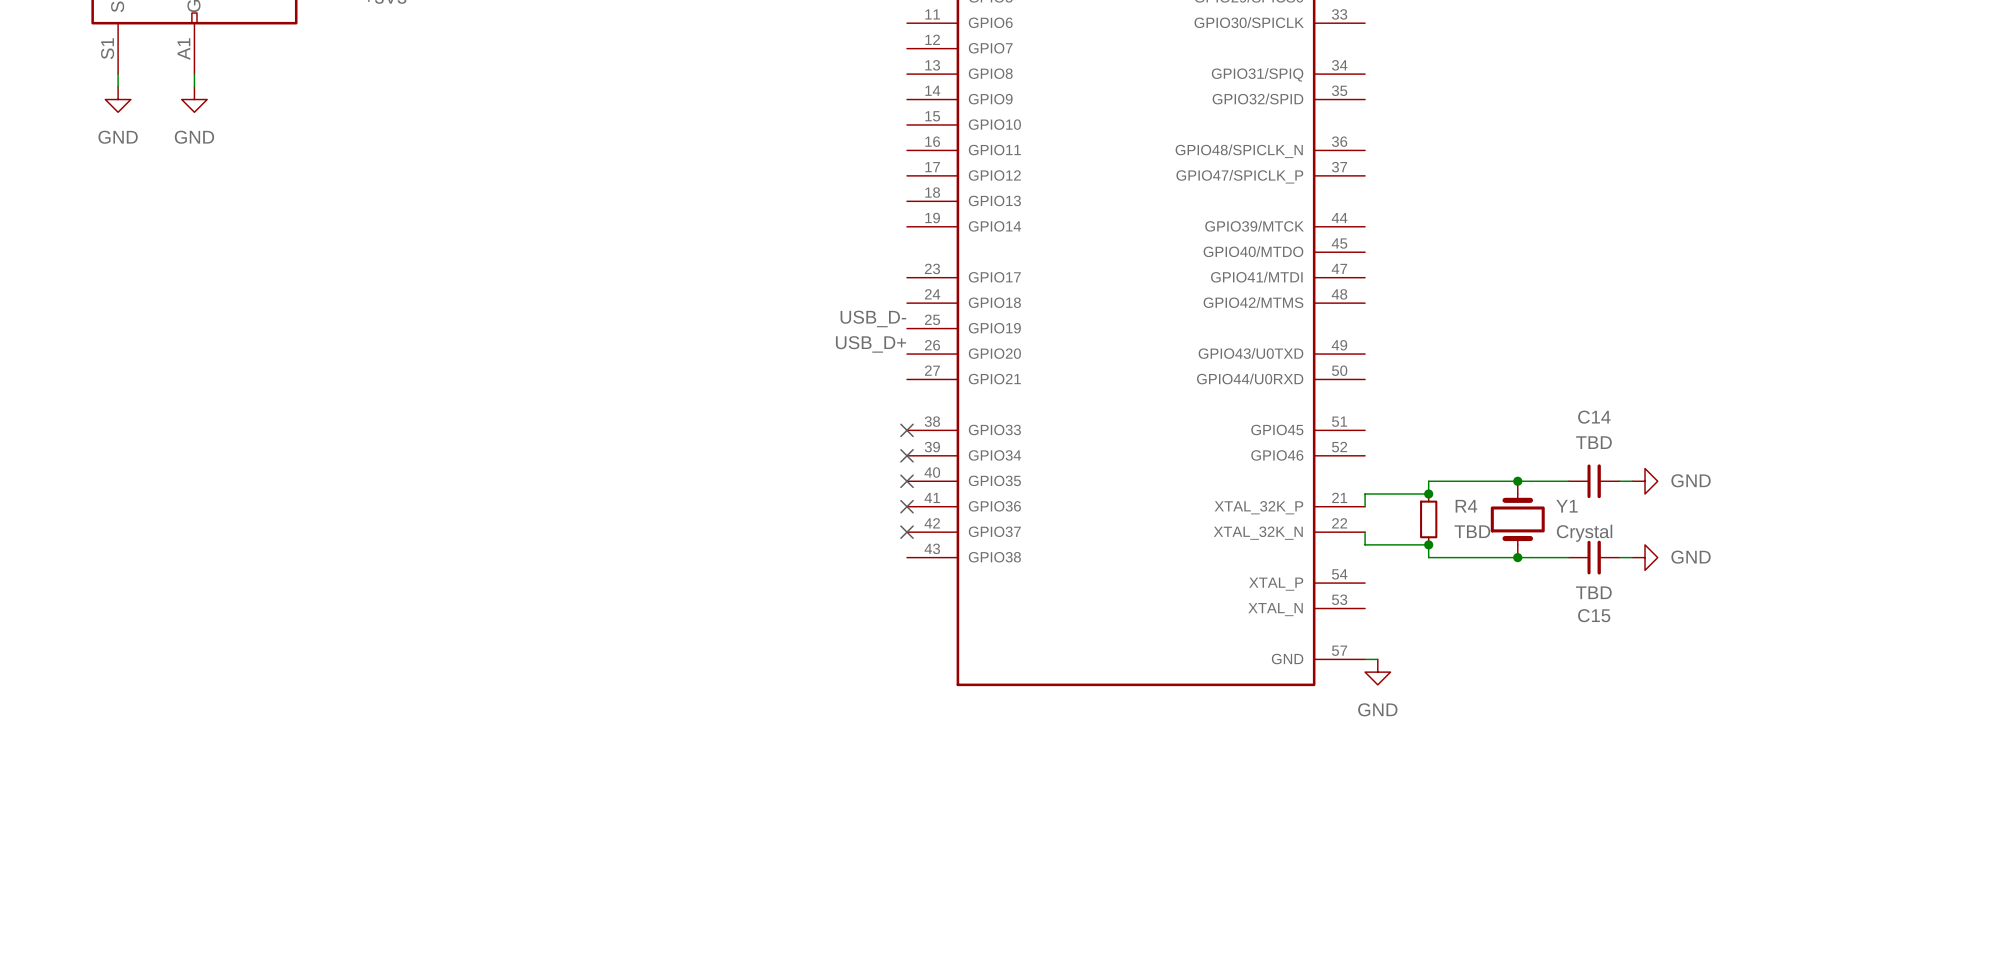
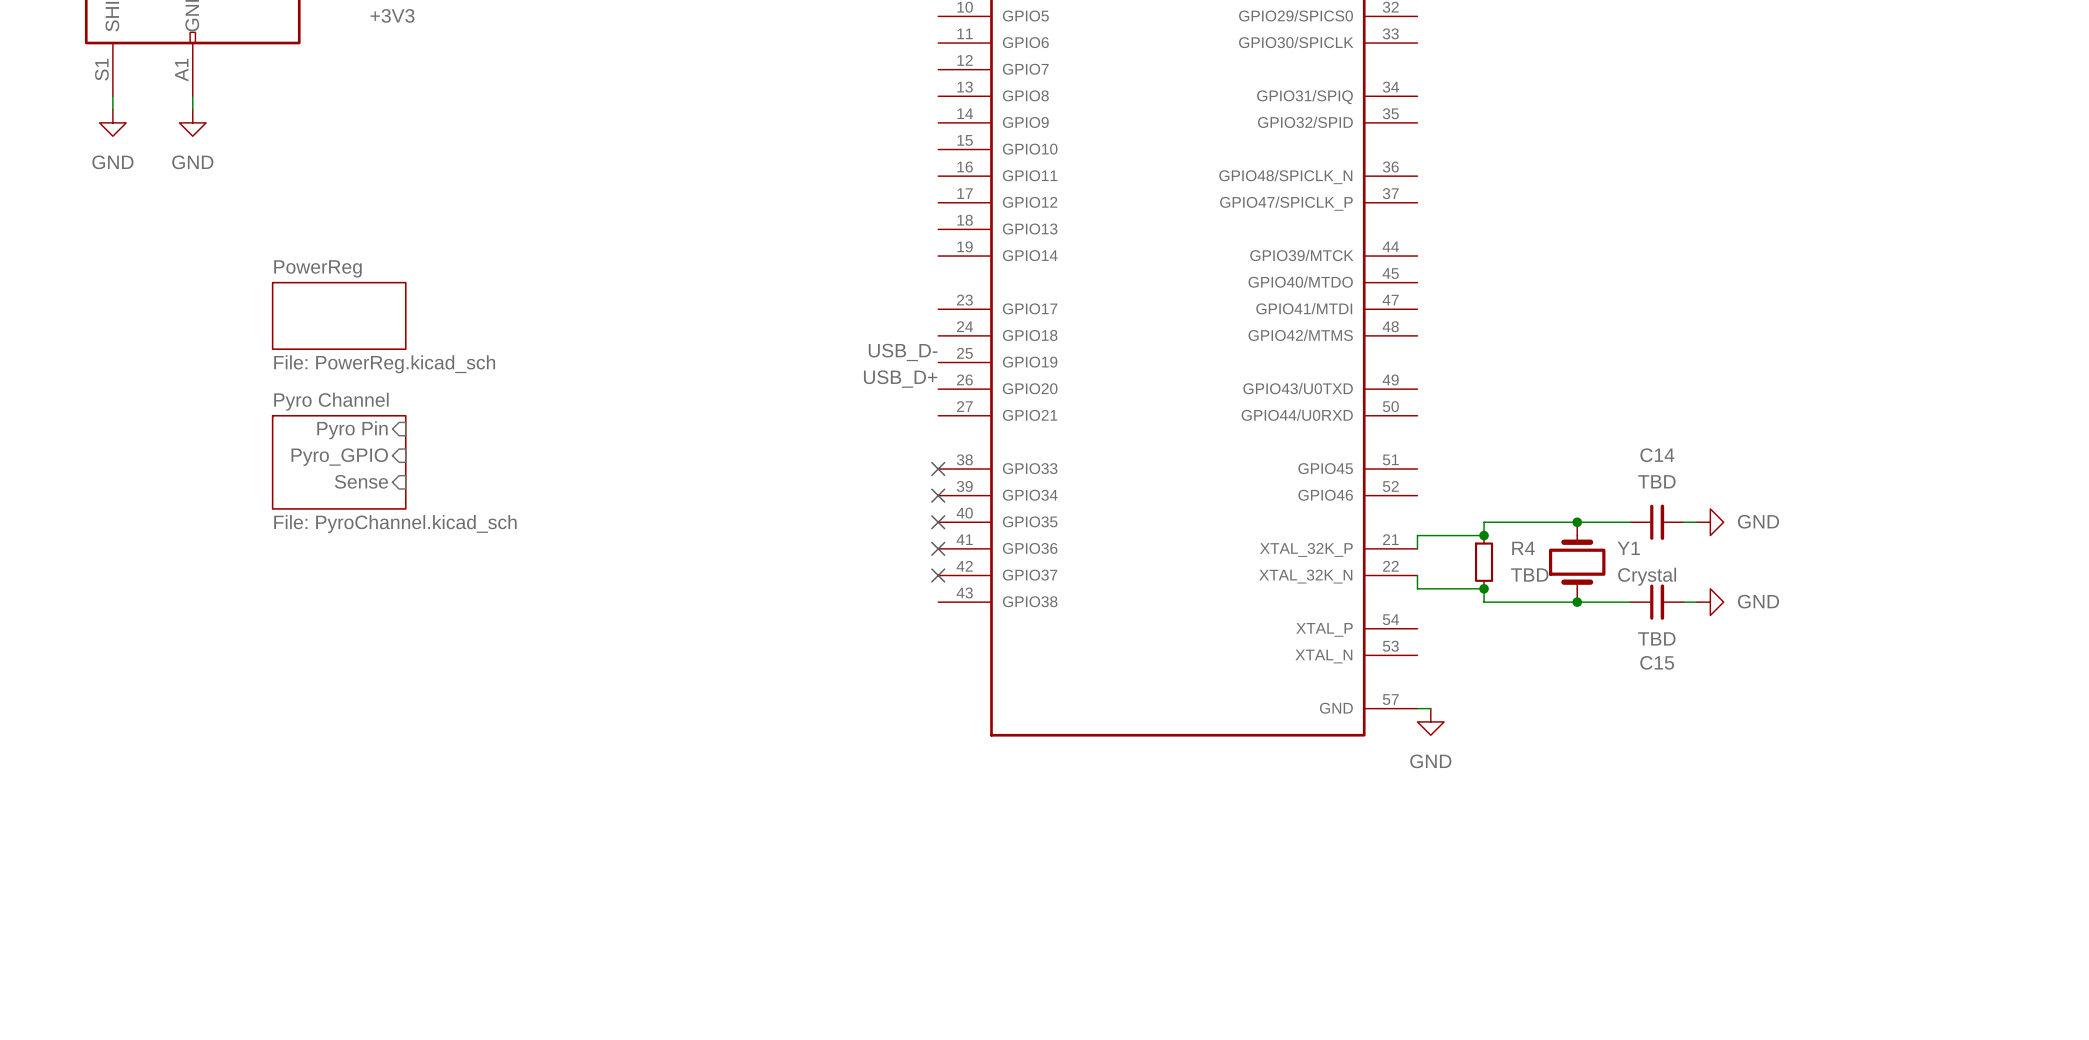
sheet PowerReg: none -> File: PowerReg.kicad_sch (339, 315)
sheet pin: none -> Pyro Pin (352, 430)
sheet pin: none -> Pyro_GPIO (339, 457)
sheet Pyro Channel: none -> File: PyroChannel.kicad_sch (339, 462)
sheet pin: none -> Sense (361, 481)

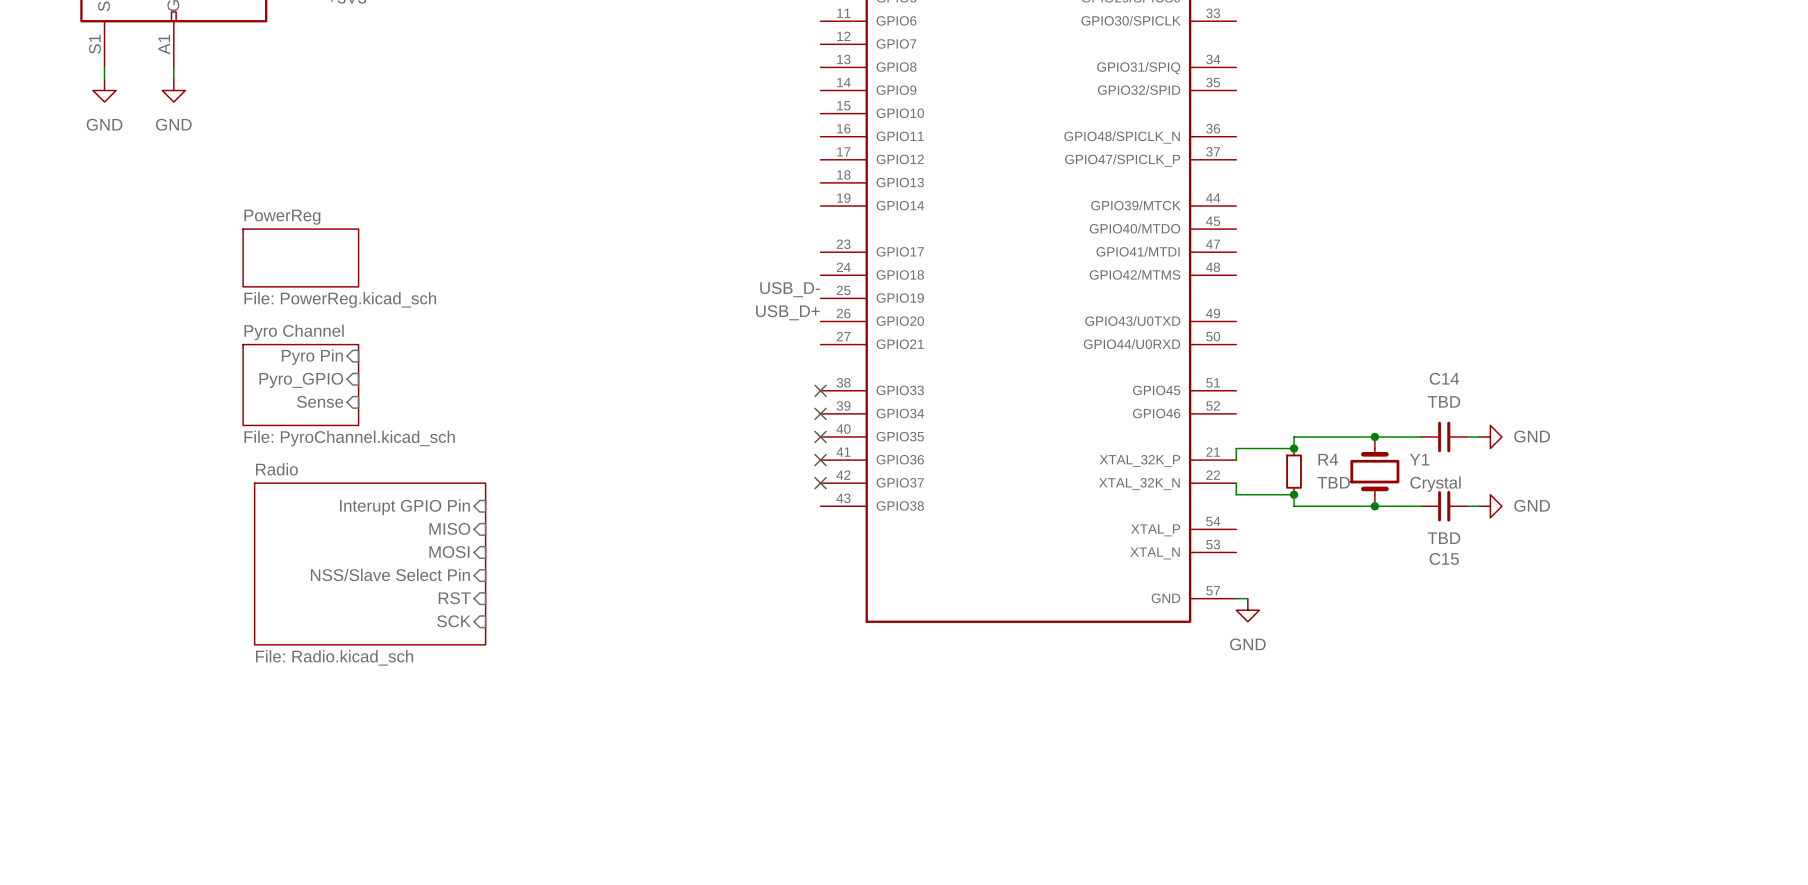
sheet pin: none -> Interupt GPIO Pin (404, 507)
sheet pin: none -> MISO (449, 528)
sheet pin: none -> MOSI (449, 552)
sheet Radio: none -> File: Radio.kicad_sch (370, 564)
sheet pin: none -> NSS/Slave Select Pin (390, 574)
sheet pin: none -> RST (454, 598)
sheet pin: none -> SCK (453, 621)

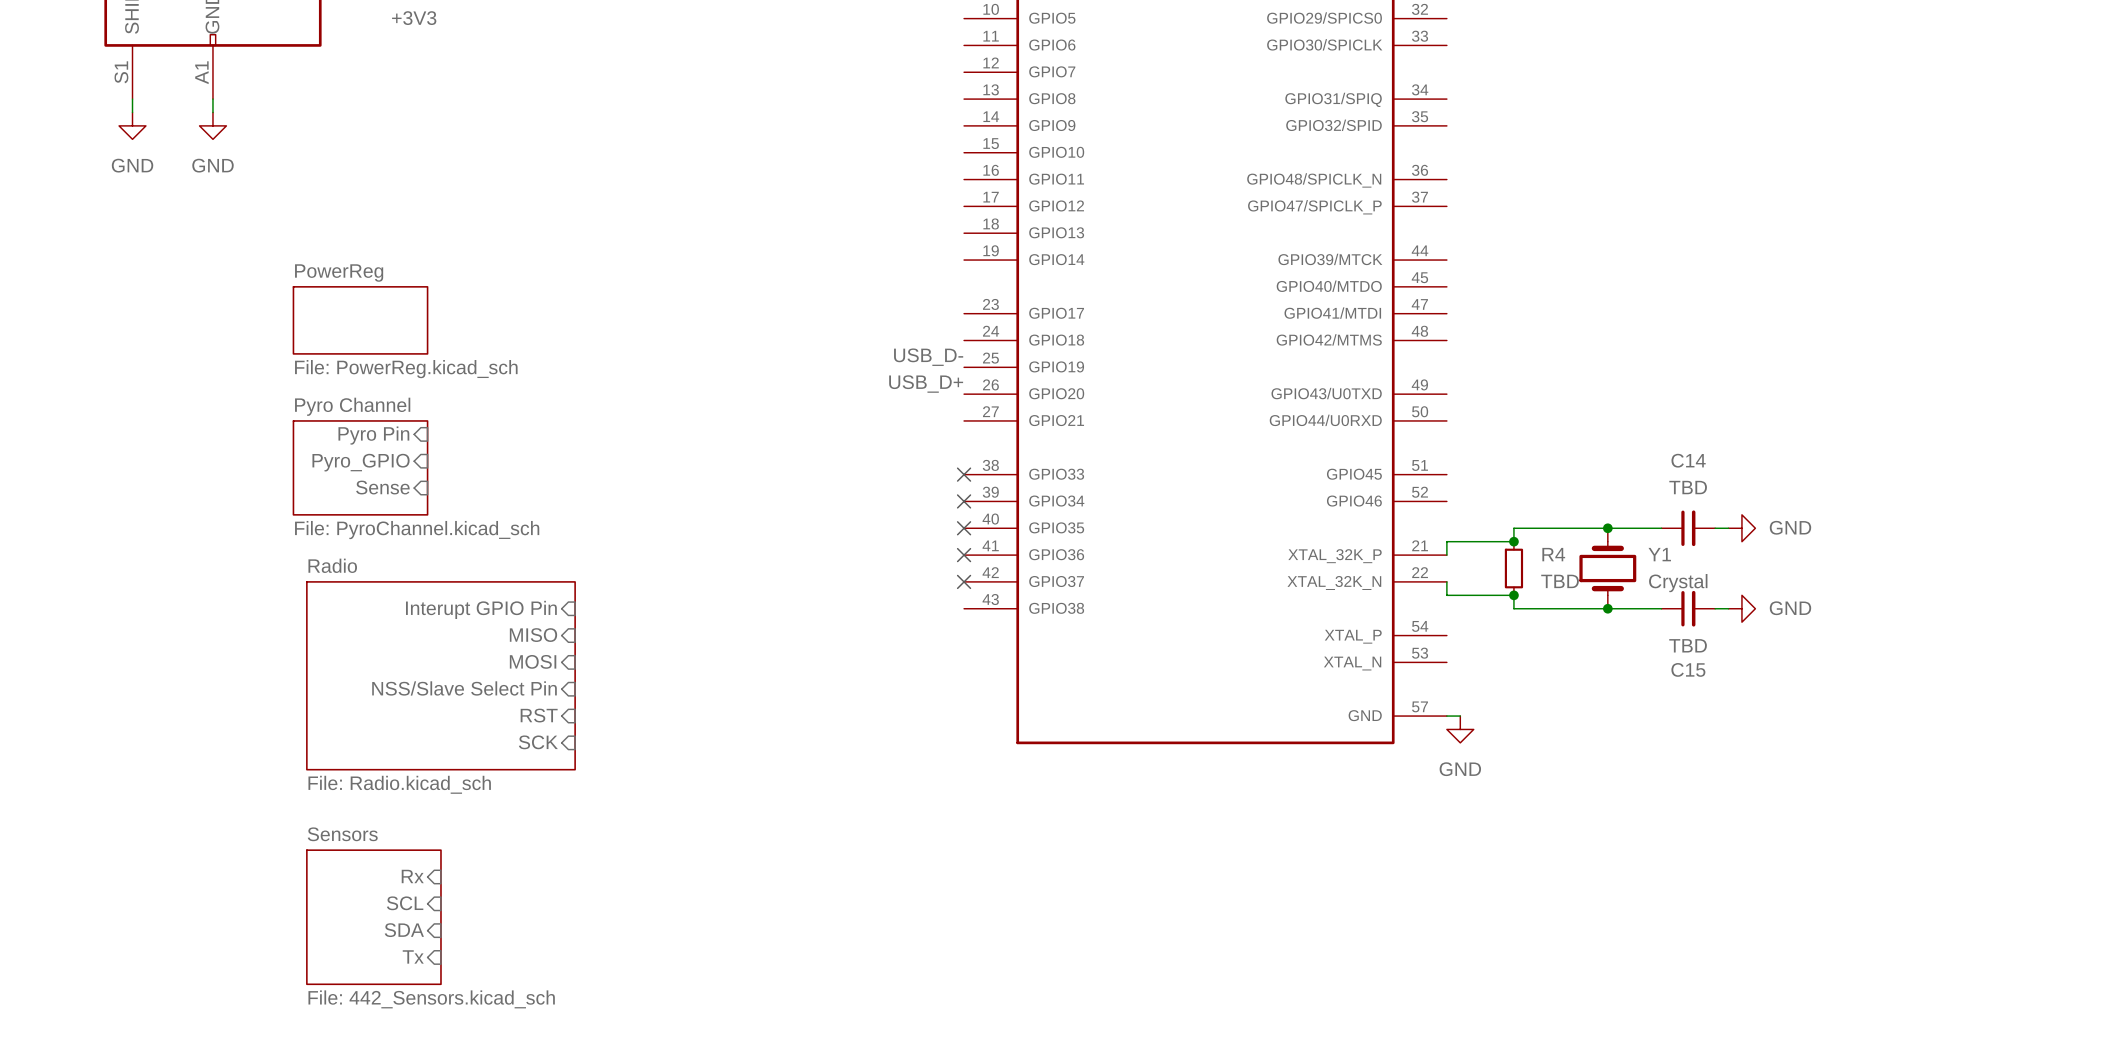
sheet pin: none -> Rx (412, 876)
sheet pin: none -> SCL (405, 903)
sheet Sensors: none -> File: 442_Sensors.kicad_sch (373, 917)
sheet pin: none -> SDA (404, 930)
sheet pin: none -> Tx (413, 956)

